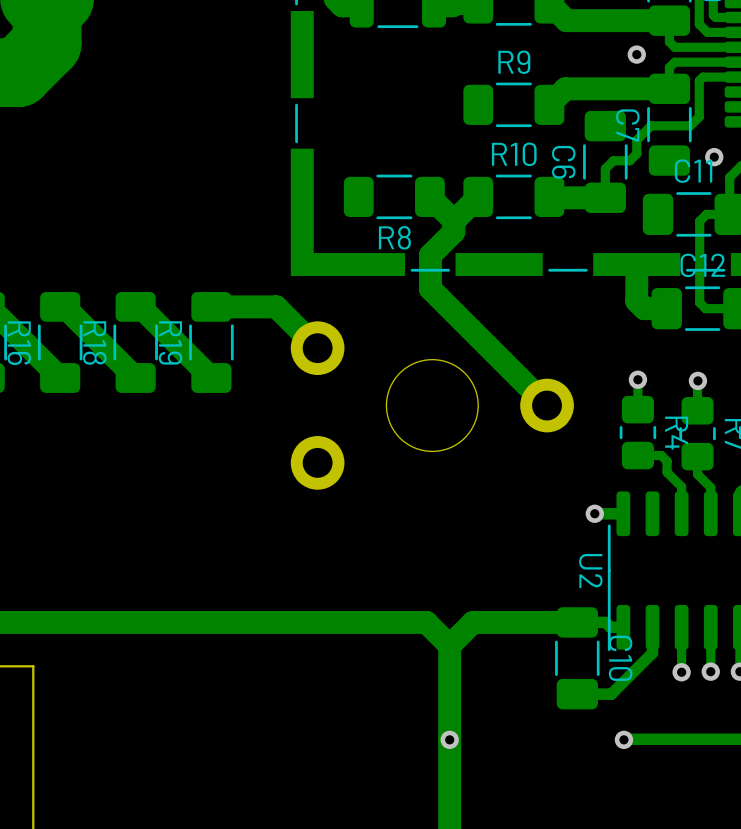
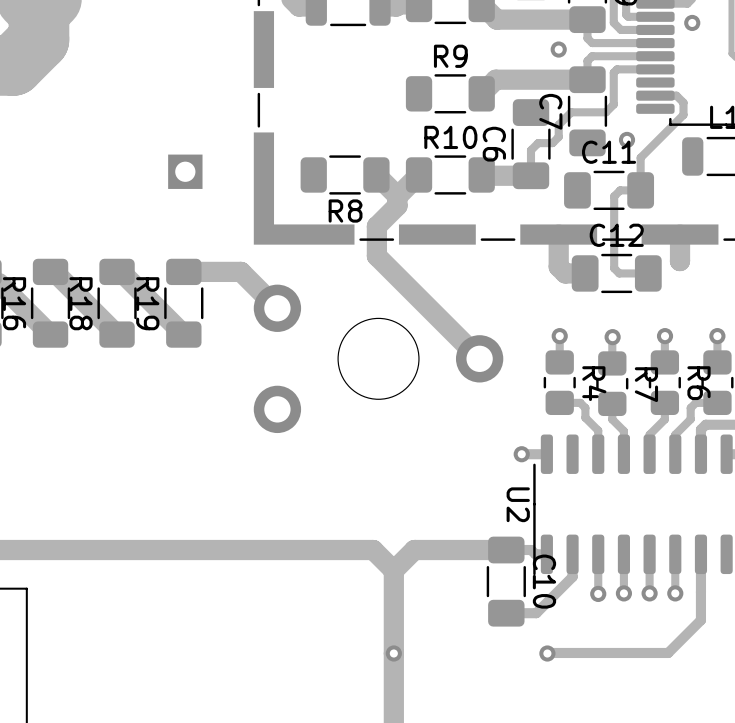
part: none -> (185, 171)

